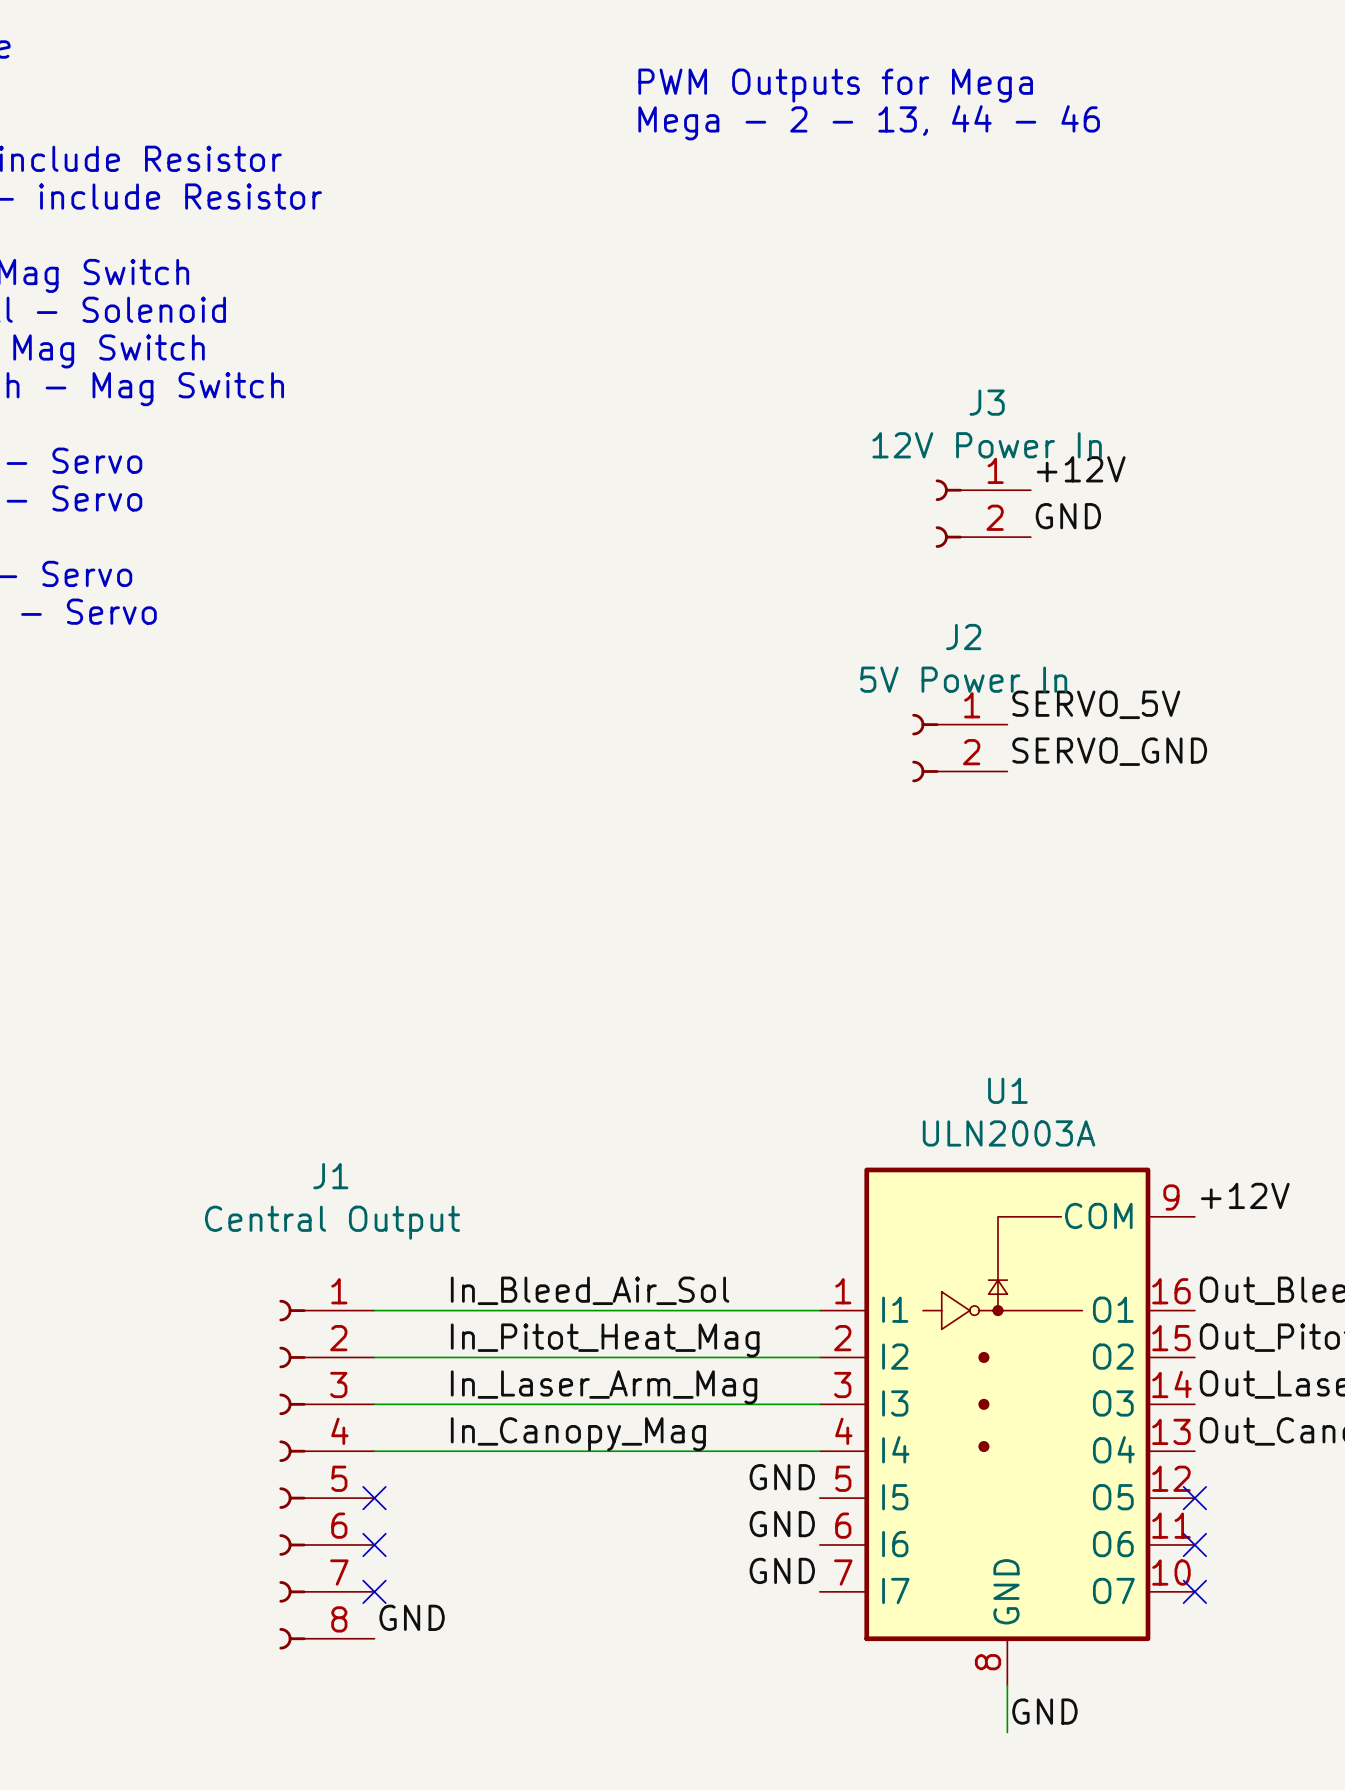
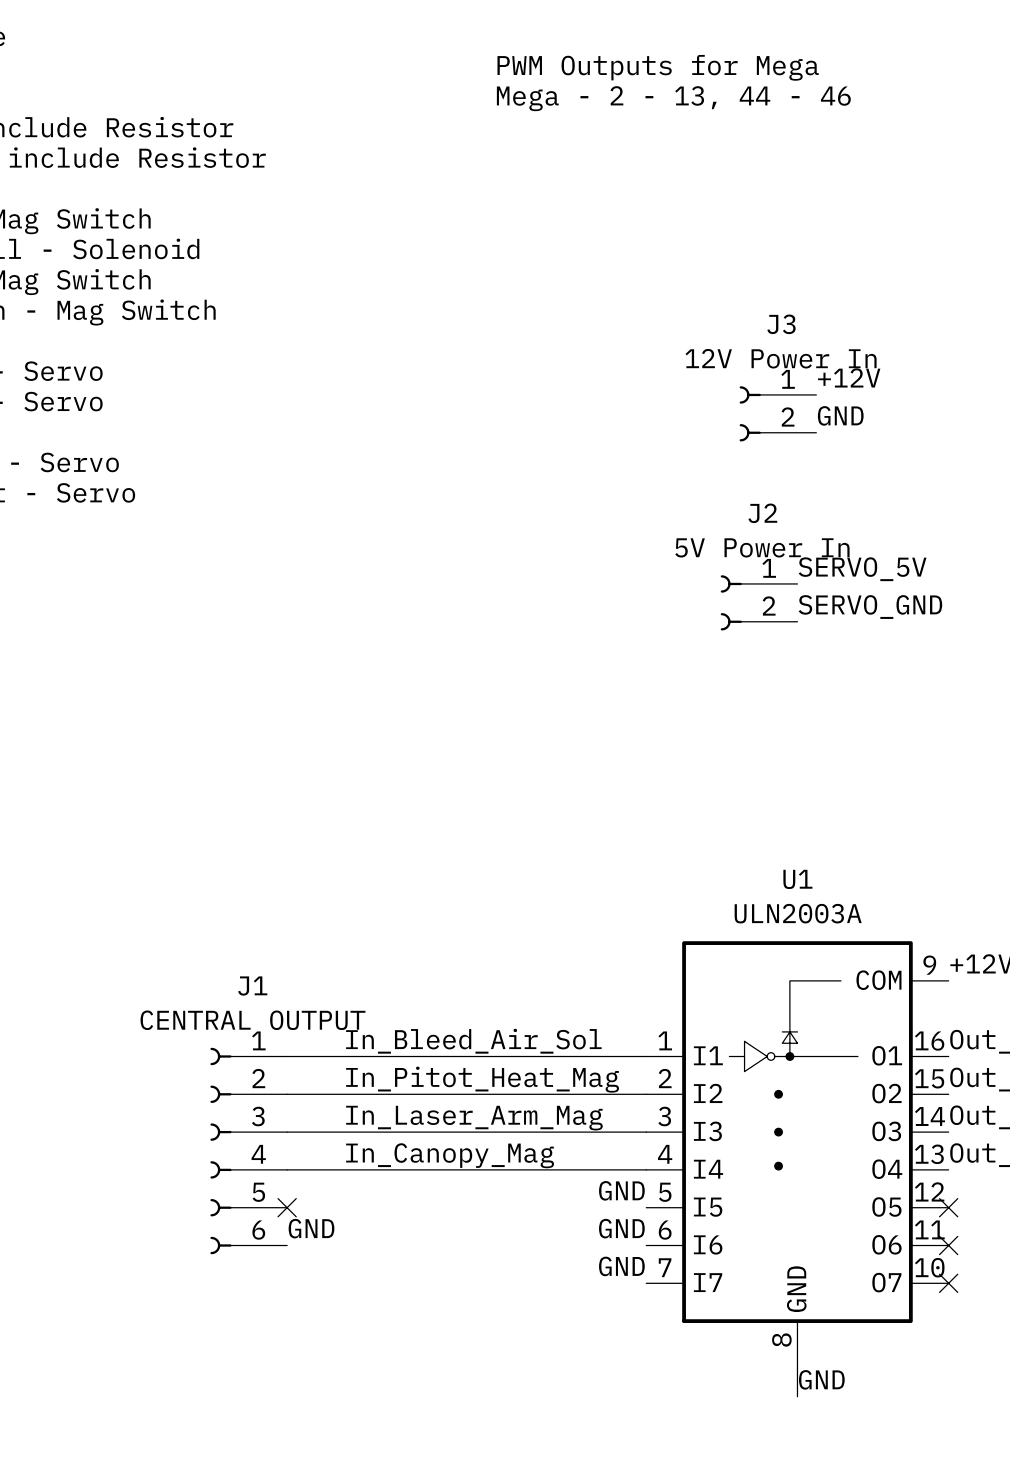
J1 name position: J1 (330, 1176) -> J1 (252, 986)
J1 value: Central Output (332, 1222) -> CENTRAL OUTPUT (252, 1020)
J1 symbol: [279, 1299, 375, 1650] -> [210, 1047, 288, 1255]
no-connect mark: (374, 1544) -> none
no-connect mark: (374, 1591) -> none
label position: GND (412, 1617) -> GND (311, 1228)

